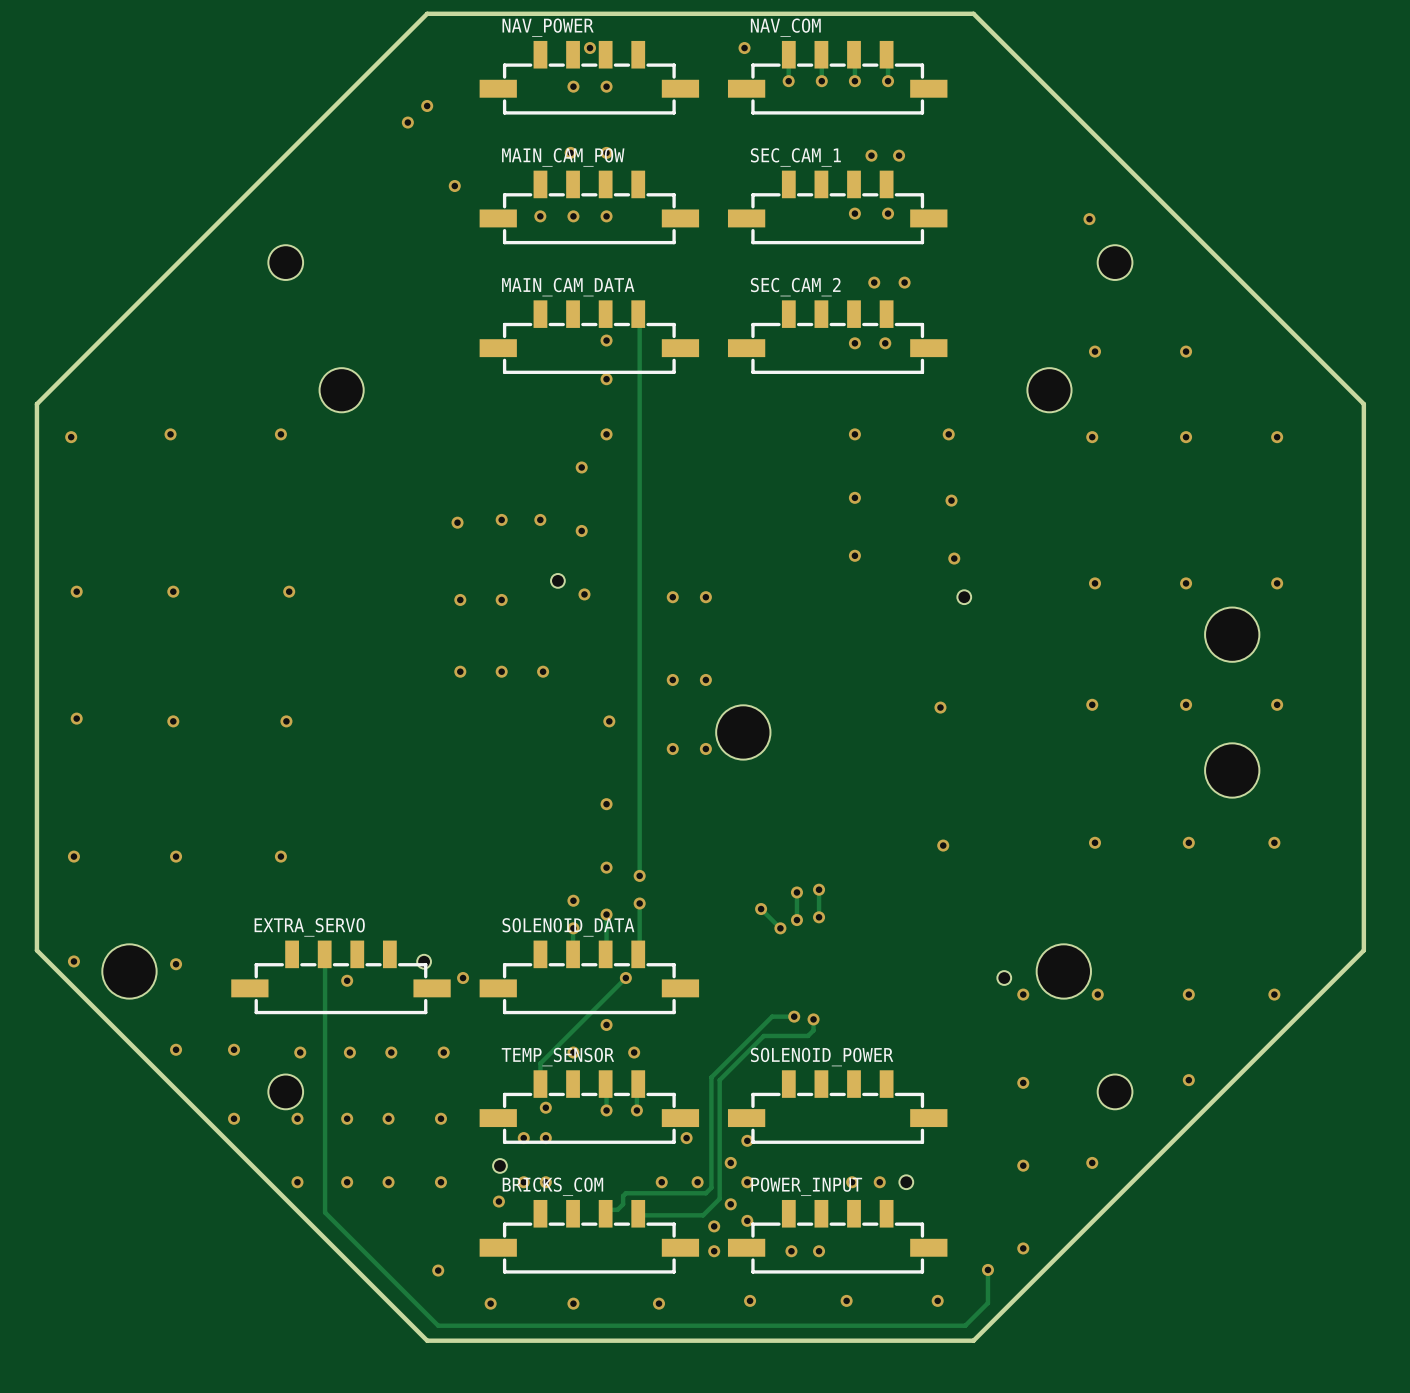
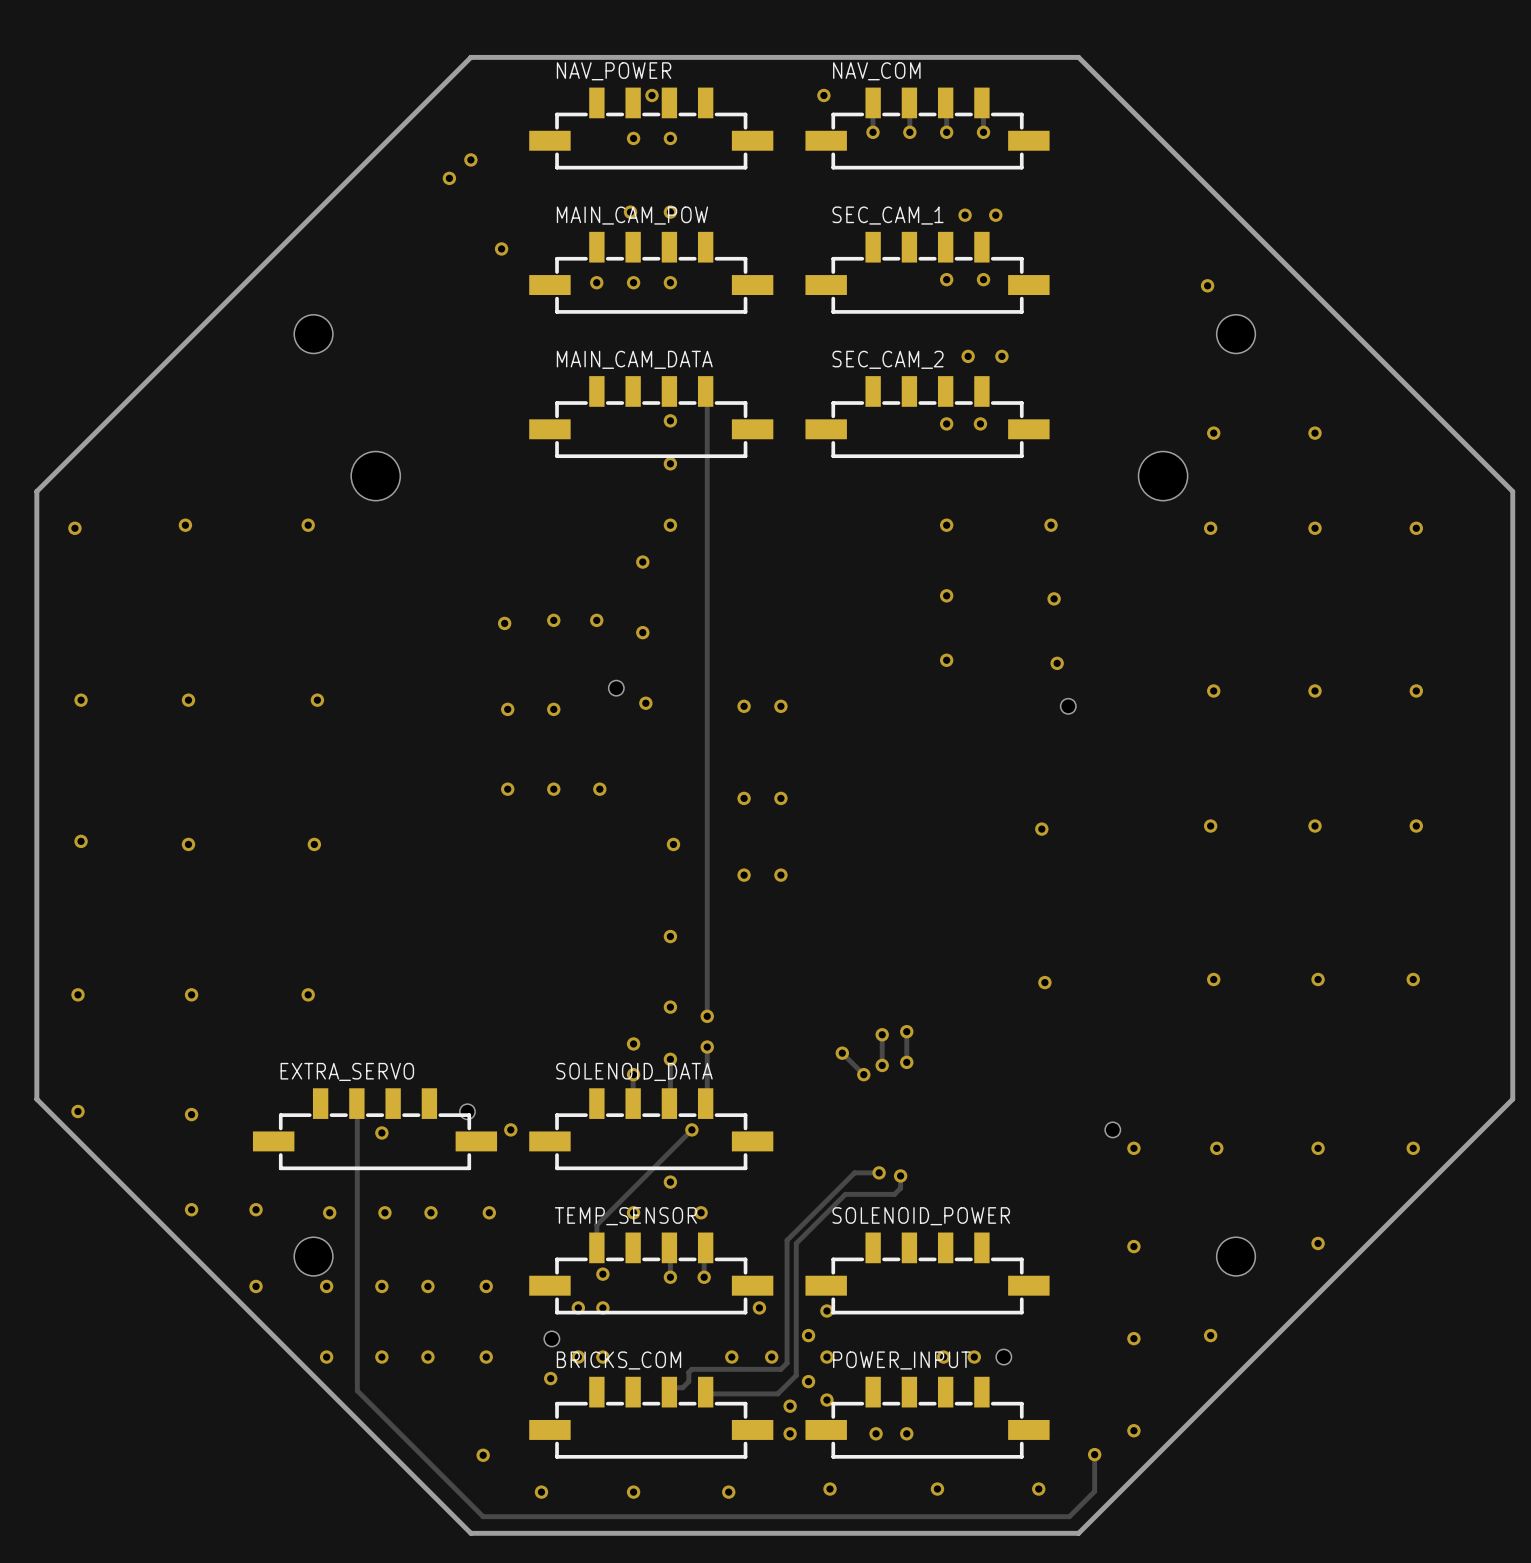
hole: (1232, 634) -> none
hole: (743, 732) -> none
hole: (1232, 770) -> none
hole: (129, 971) -> none
hole: (1063, 971) -> none

